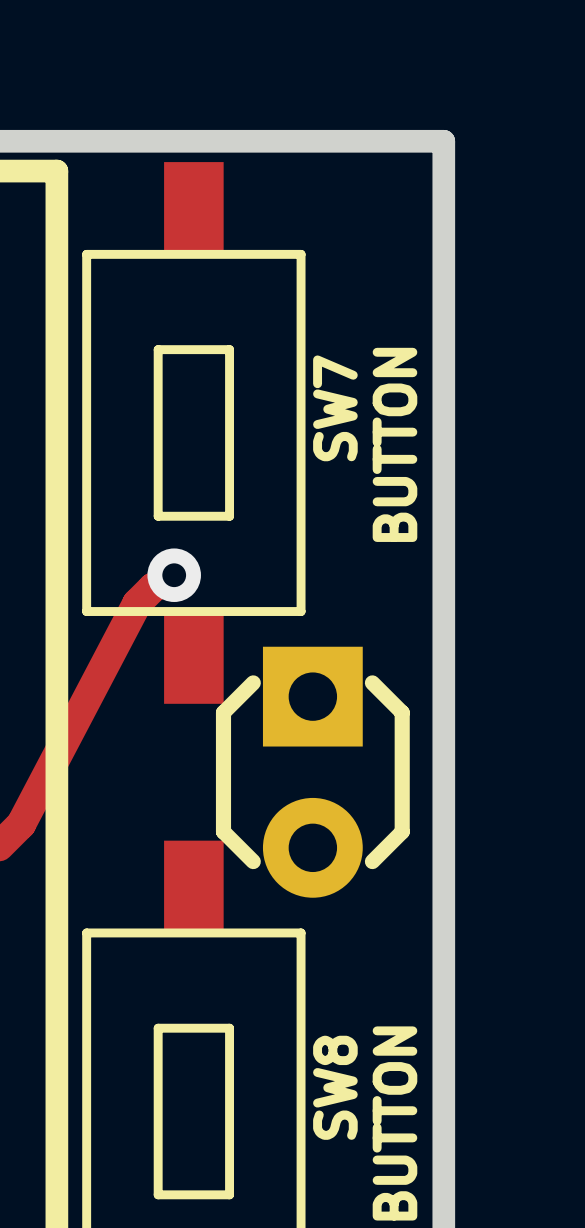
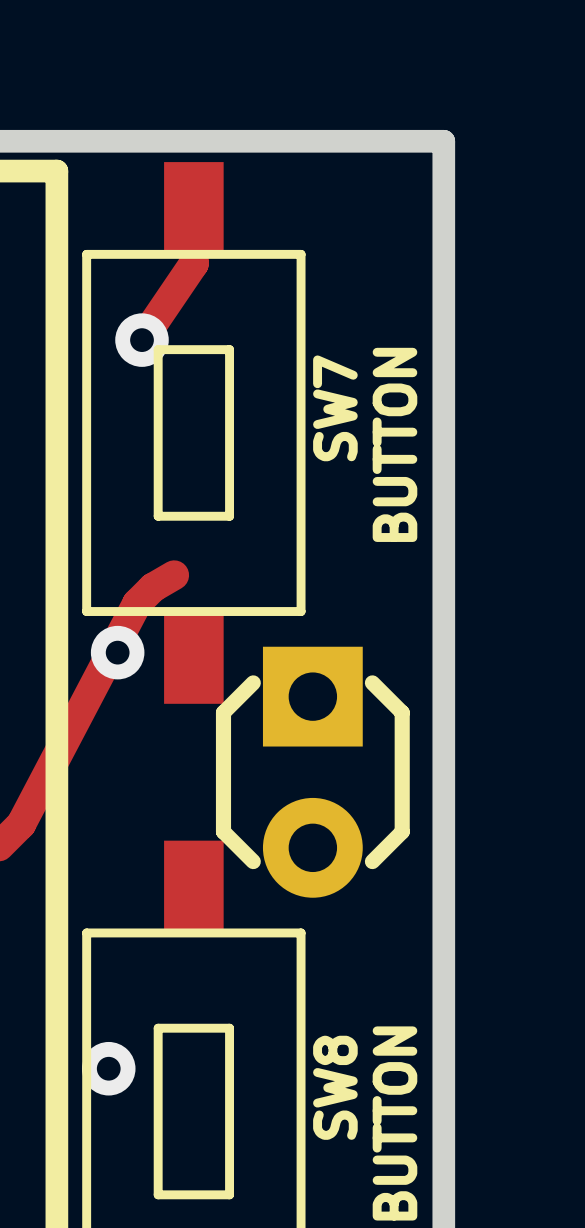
track: none -> (193, 206) (193, 263) (142, 340)
via: none -> (142, 340)
via position: (174, 575) -> (117, 652)
via: none -> (108, 1068)

